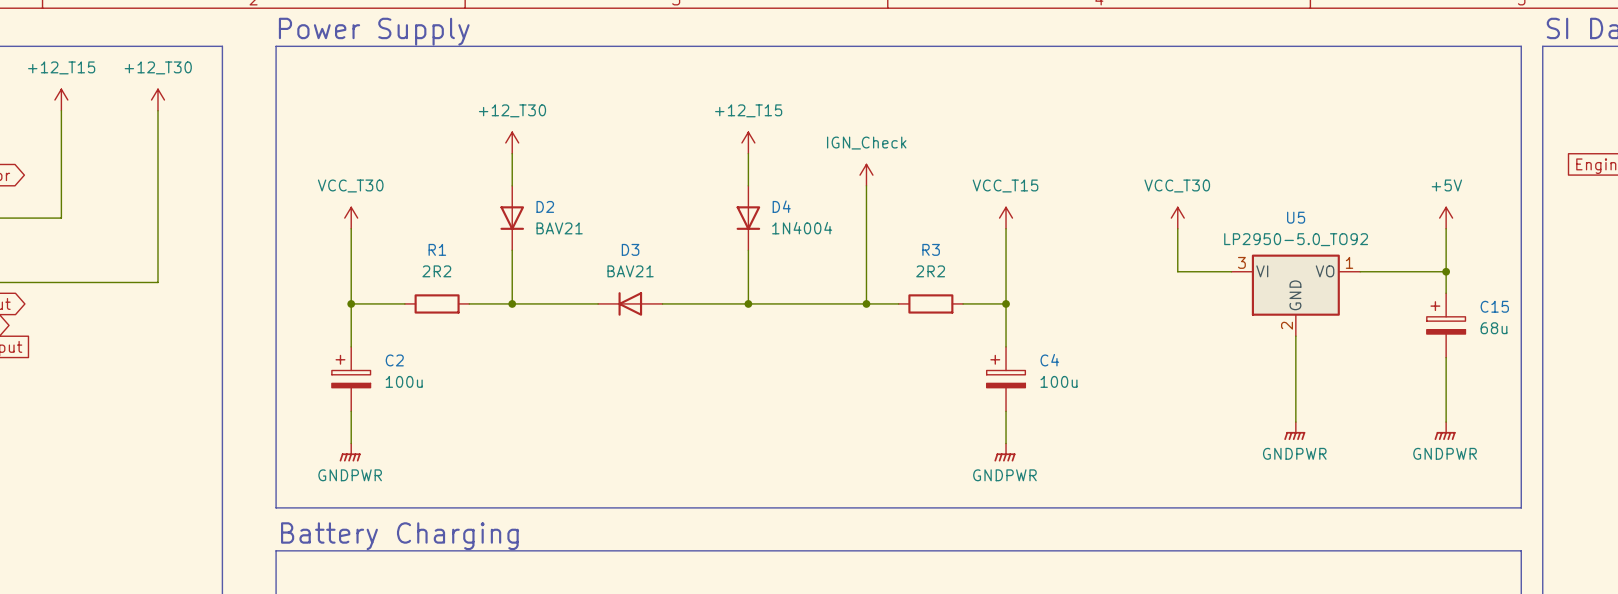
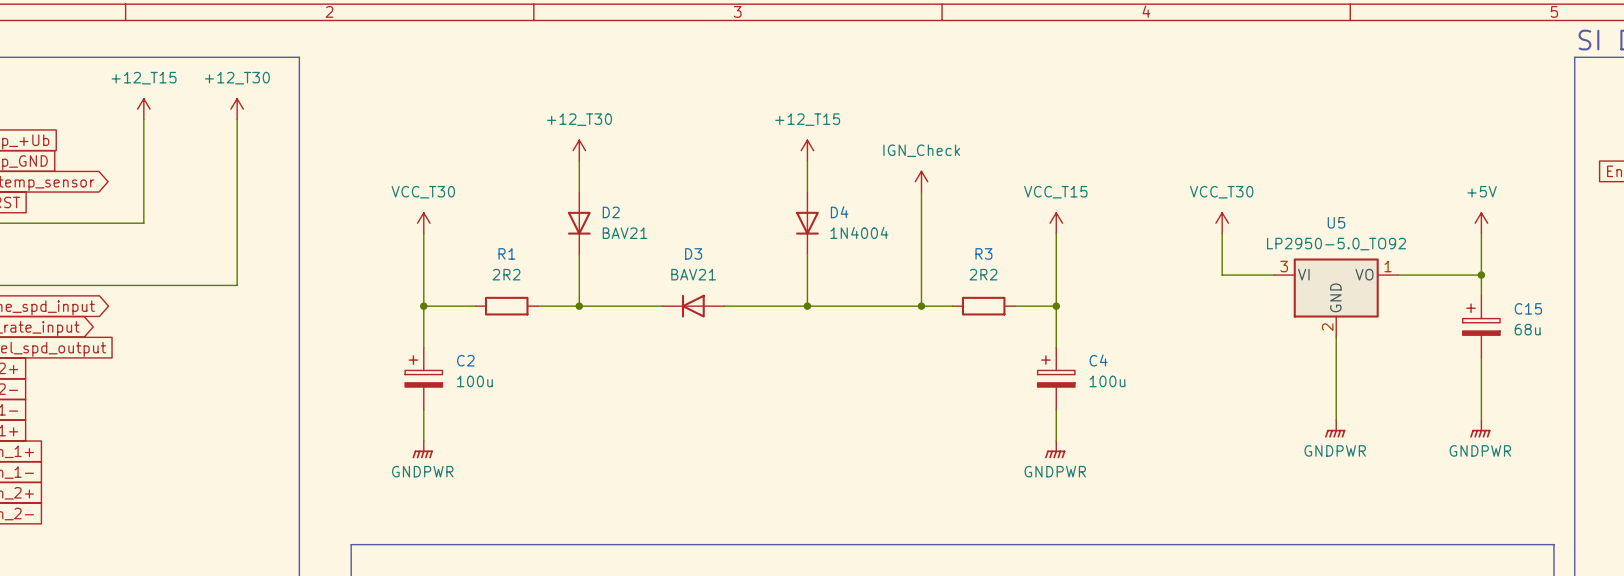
text: Power Supply (374, 31) -> none
line: (276, 46) (1521, 46) (1521, 507) (276, 507) (276, 46) -> none
text: Battery Charging (399, 536) -> none

